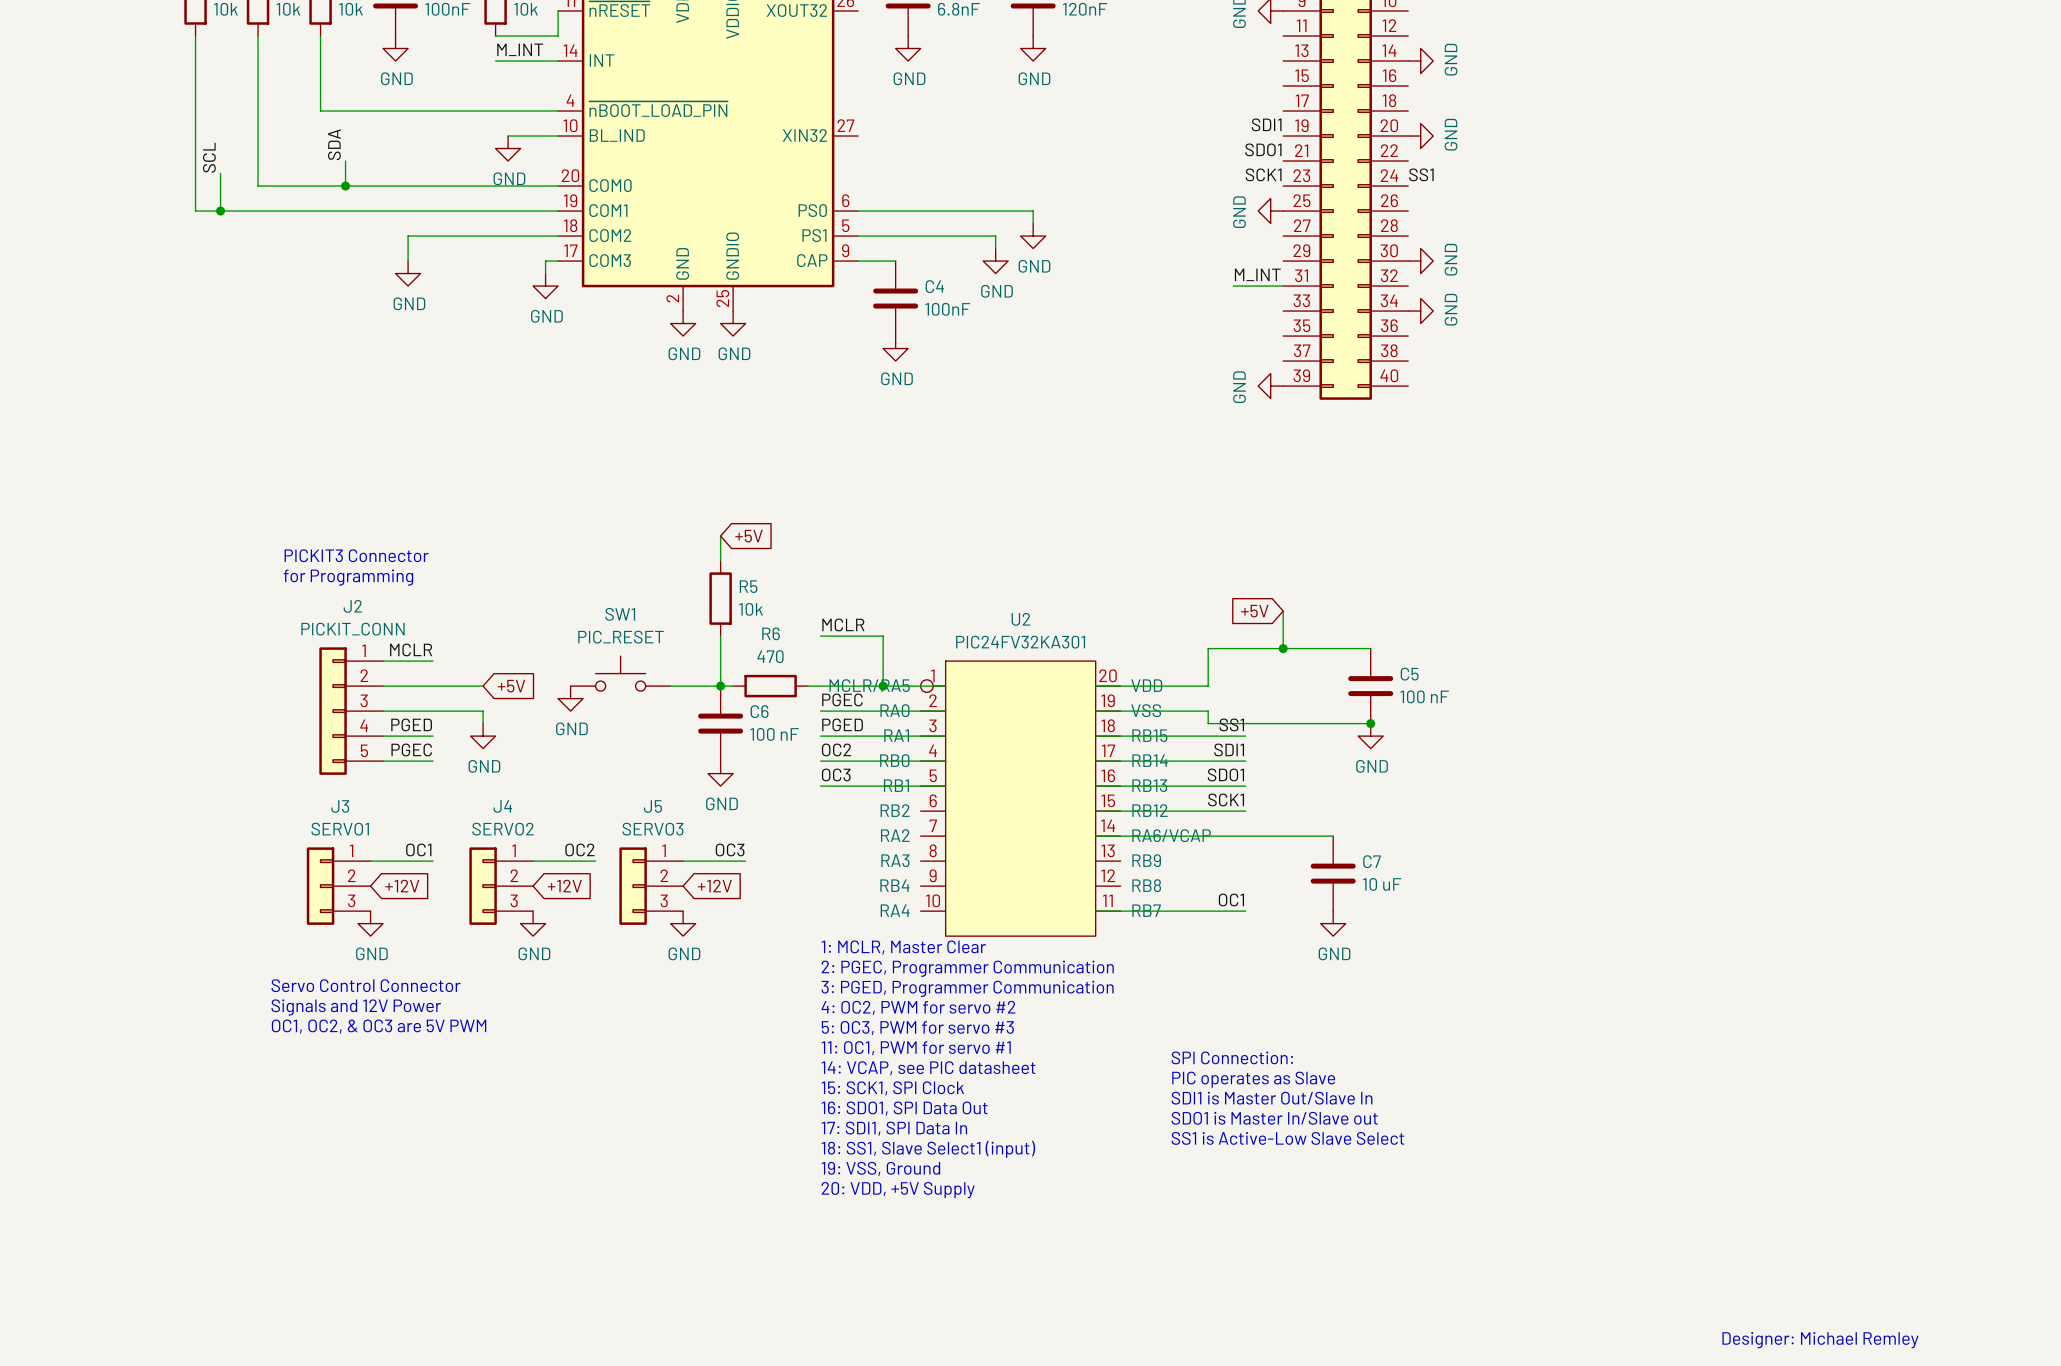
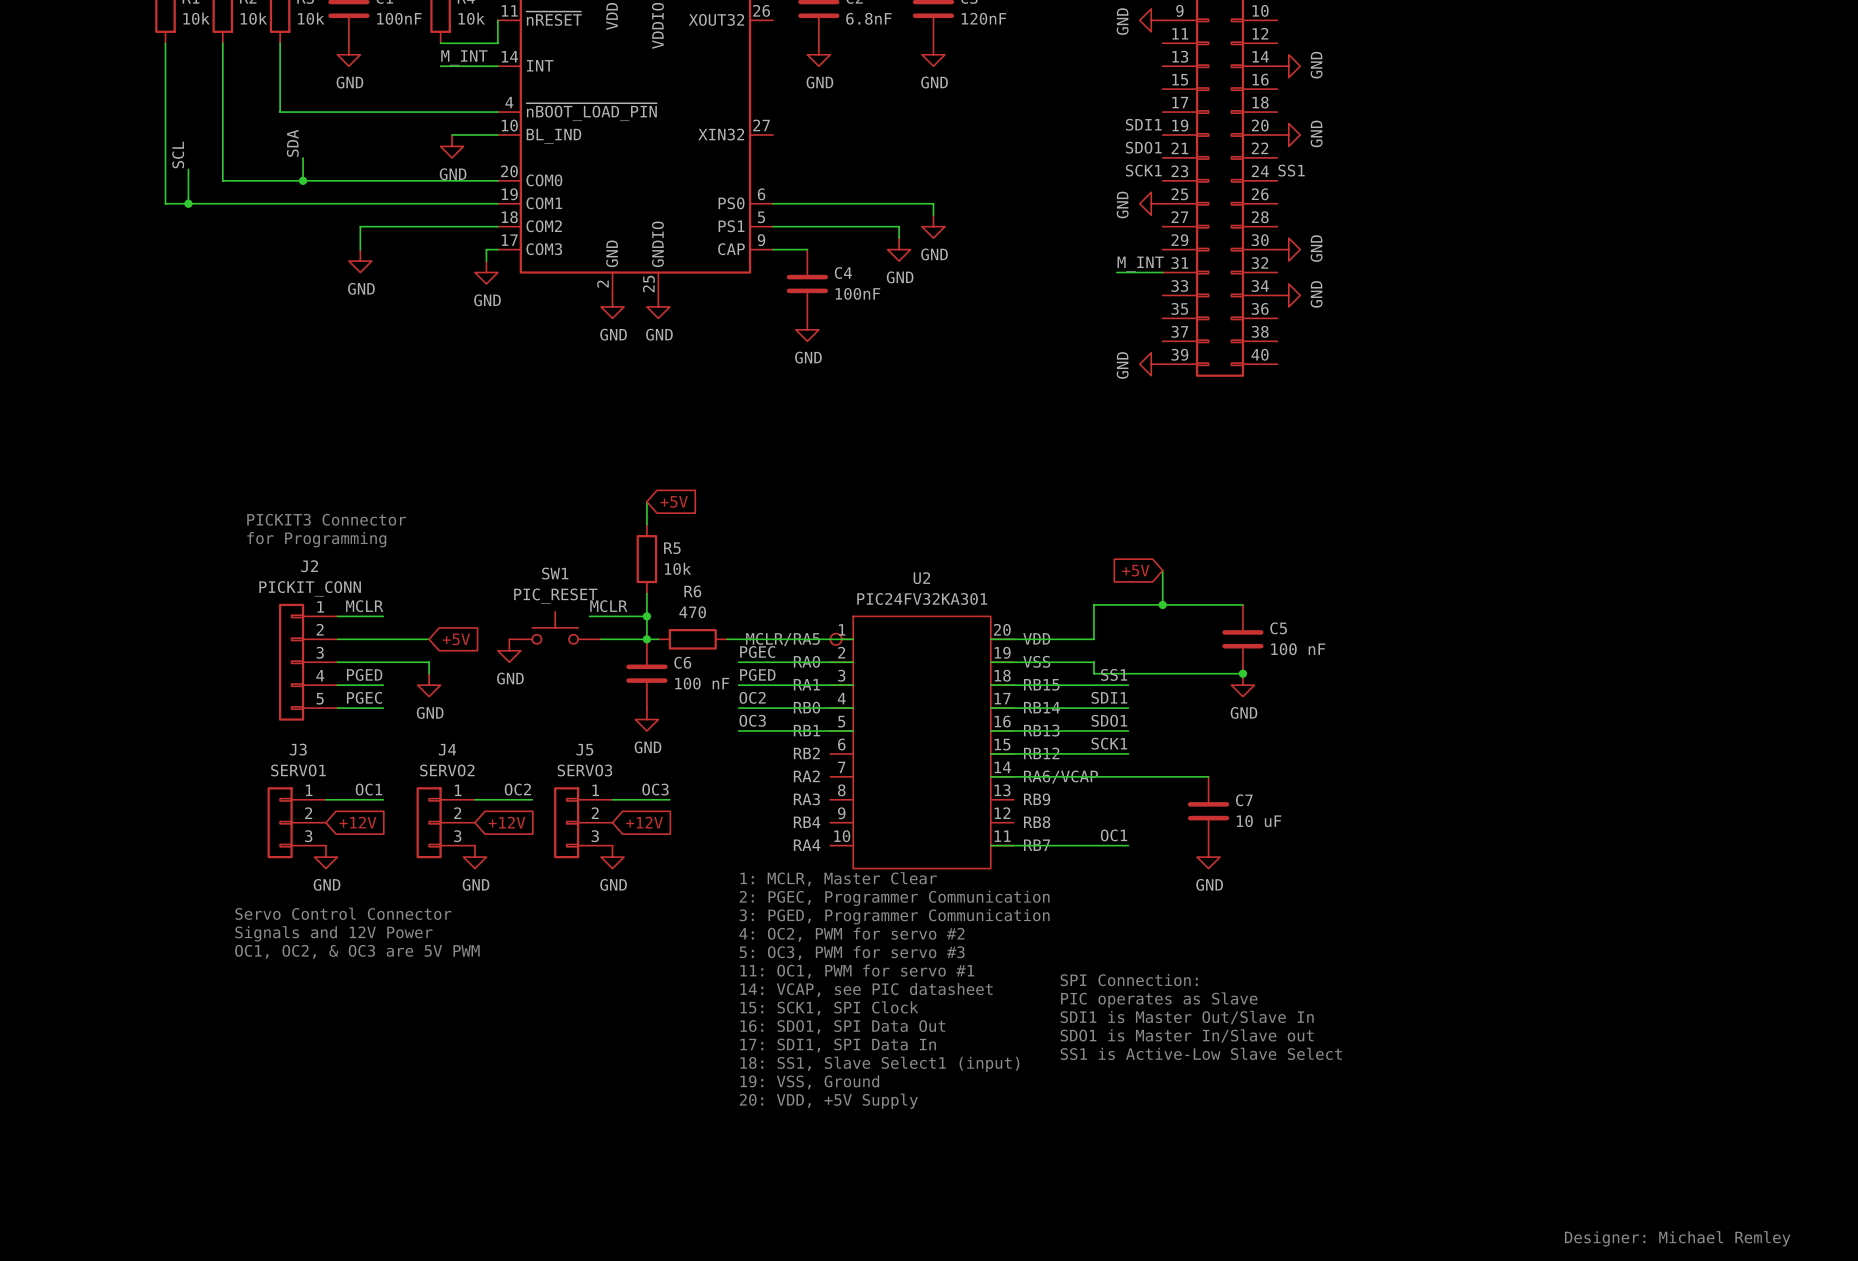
label position: MCLR (843, 624) -> MCLR (608, 606)
wire: (820, 636) (883, 636) (883, 686) -> none
wire: none -> (589, 616) (646, 616)
junction: none -> (646, 616)
junction: (883, 686) -> none

